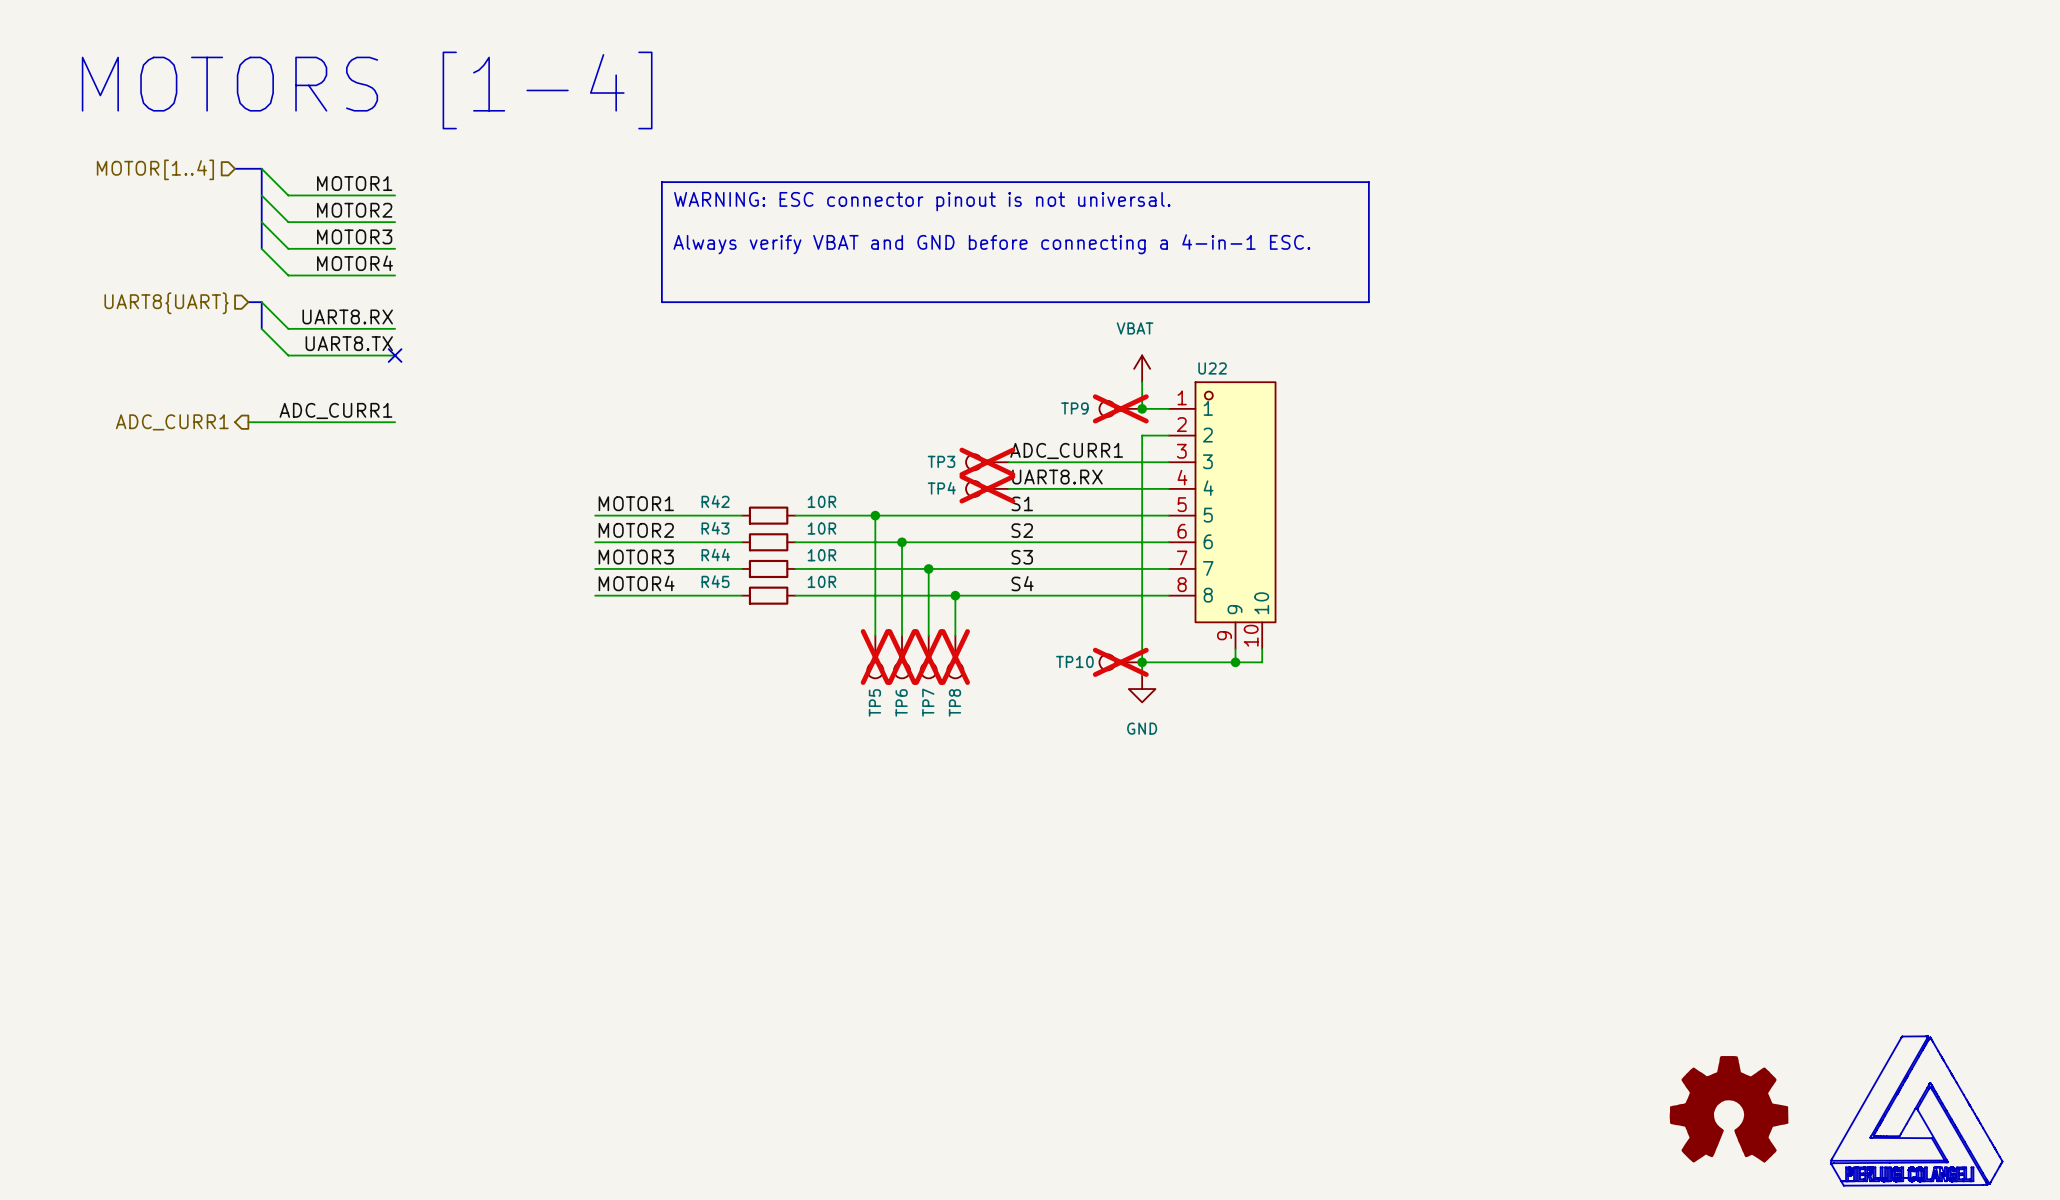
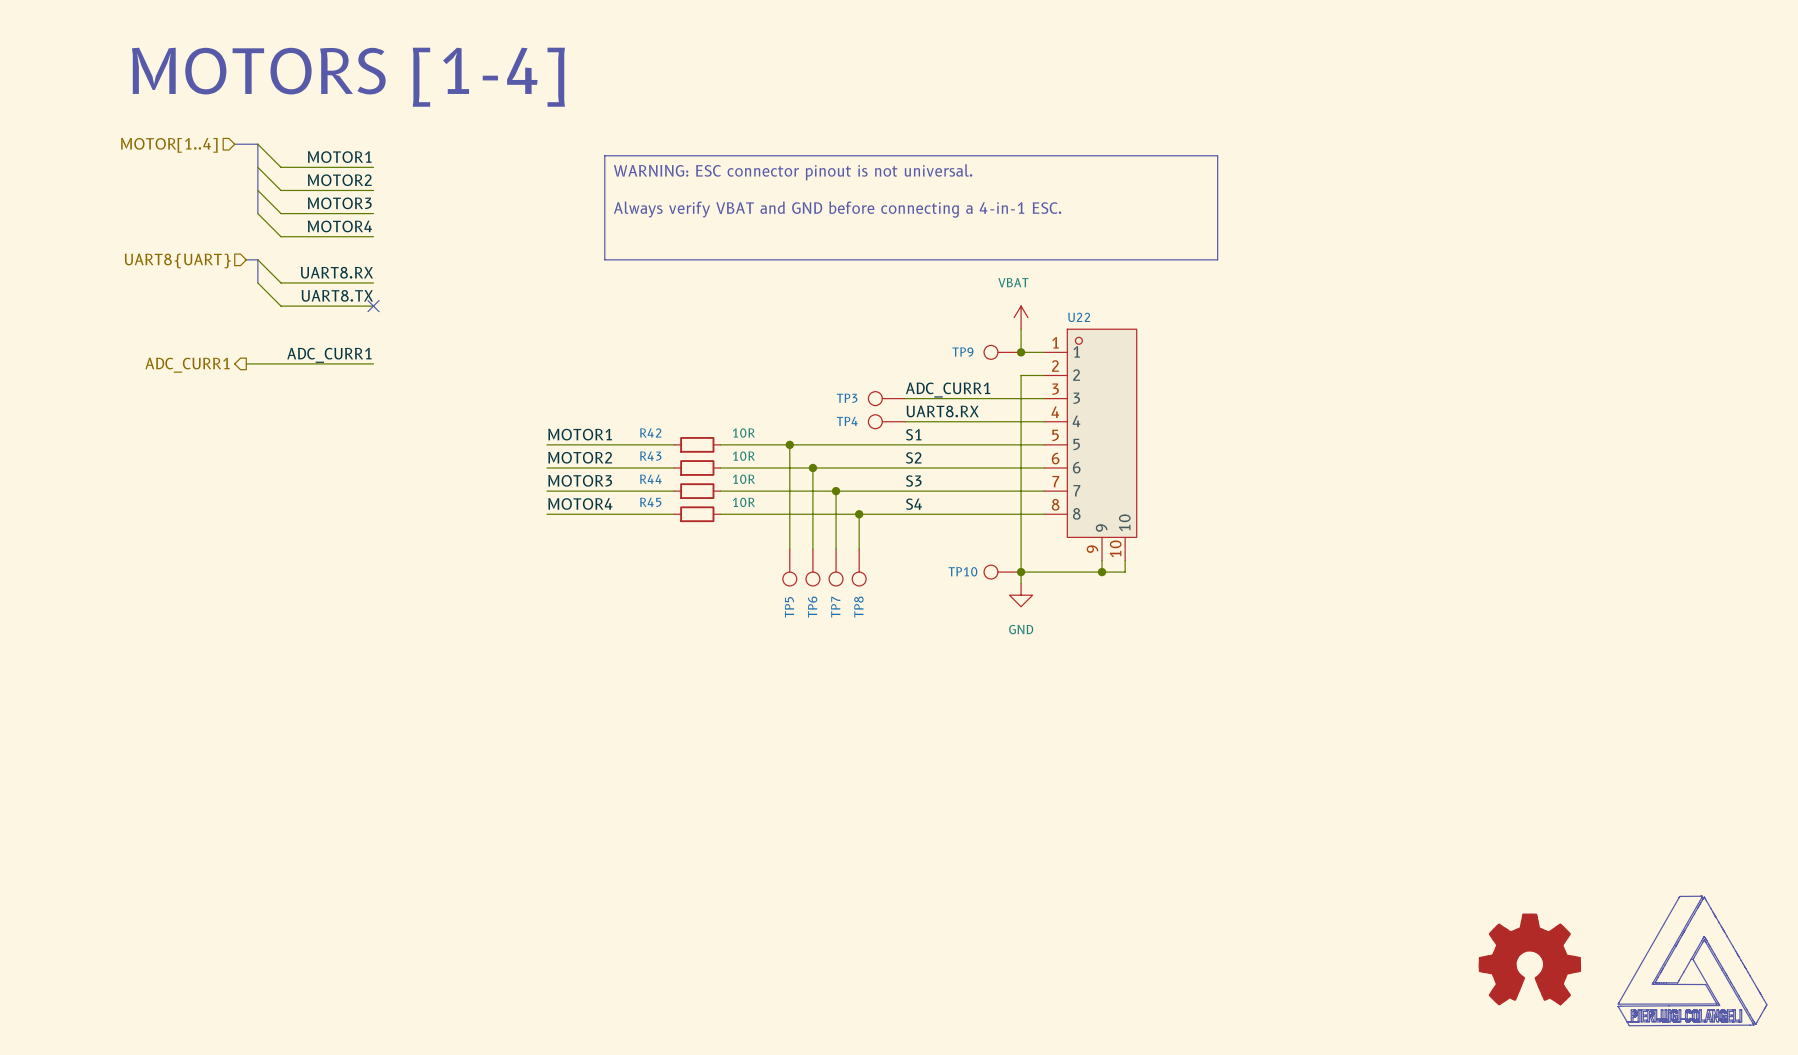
TP9 do-not-place cross: (1120, 408) -> none
TP3 do-not-place cross: (987, 462) -> none
TP4 do-not-place cross: (987, 488) -> none
TP5 do-not-place cross: (875, 657) -> none
TP6 do-not-place cross: (902, 657) -> none
TP7 do-not-place cross: (928, 657) -> none
TP8 do-not-place cross: (955, 657) -> none
TP10 do-not-place cross: (1120, 662) -> none

